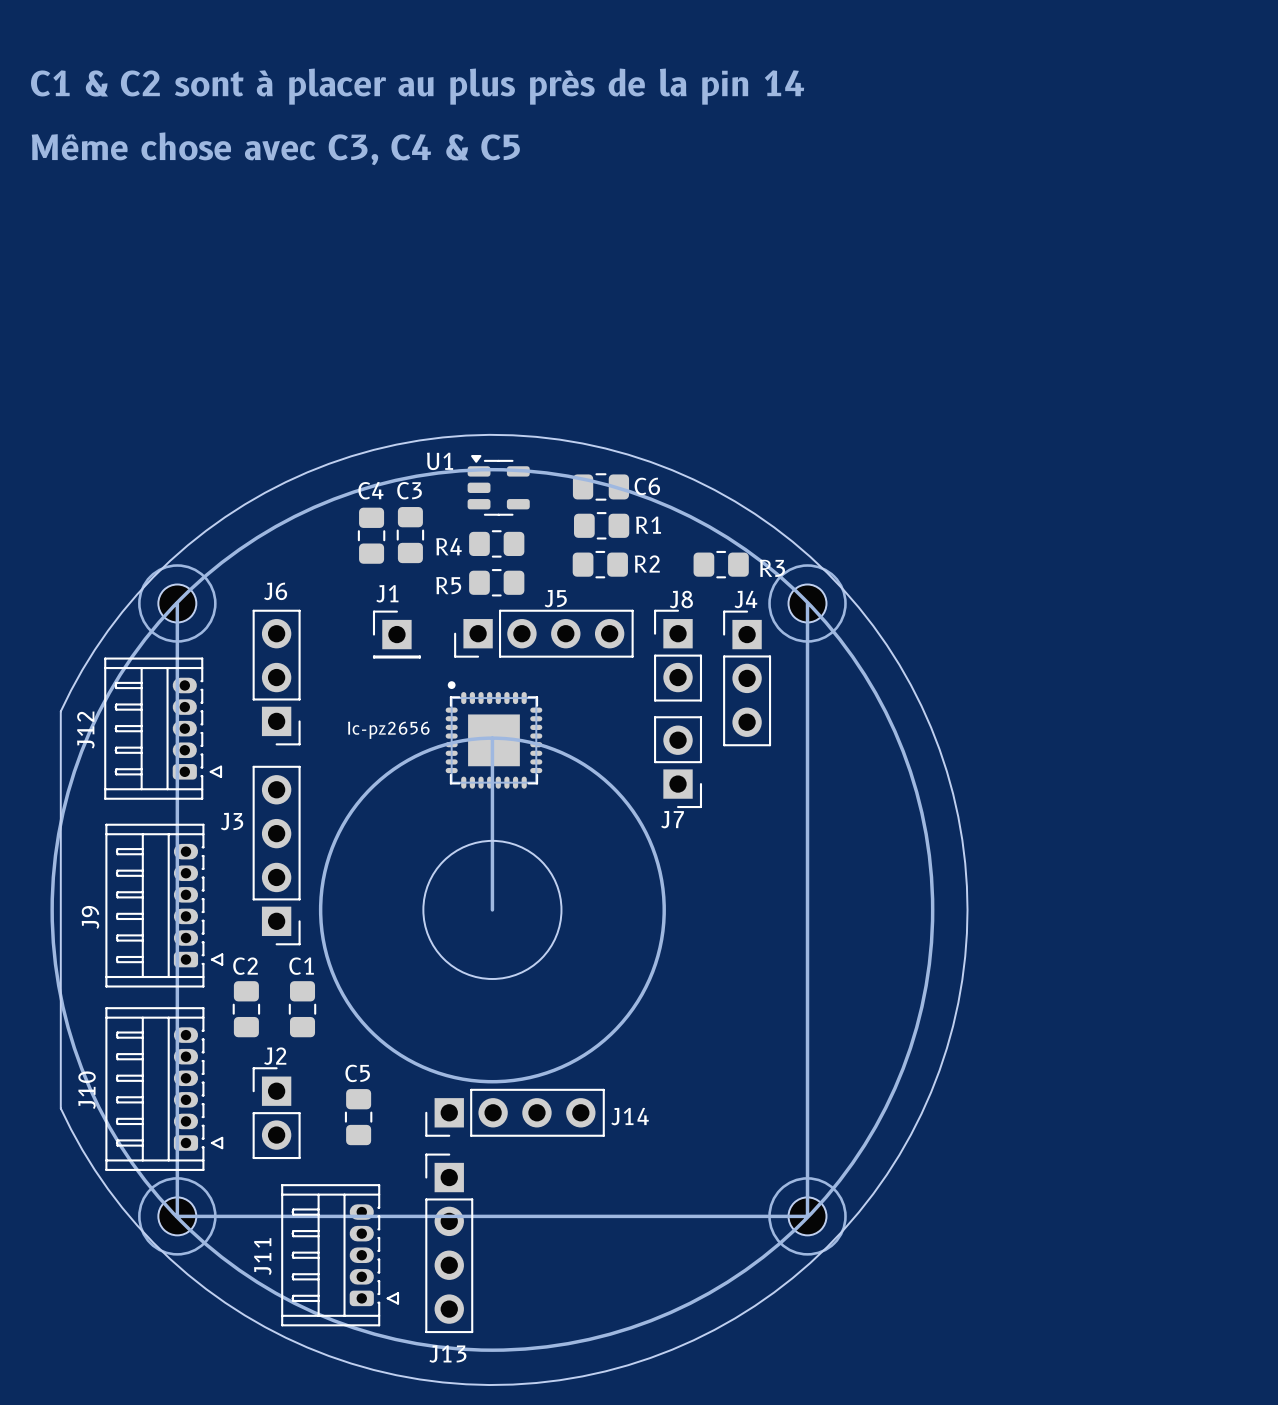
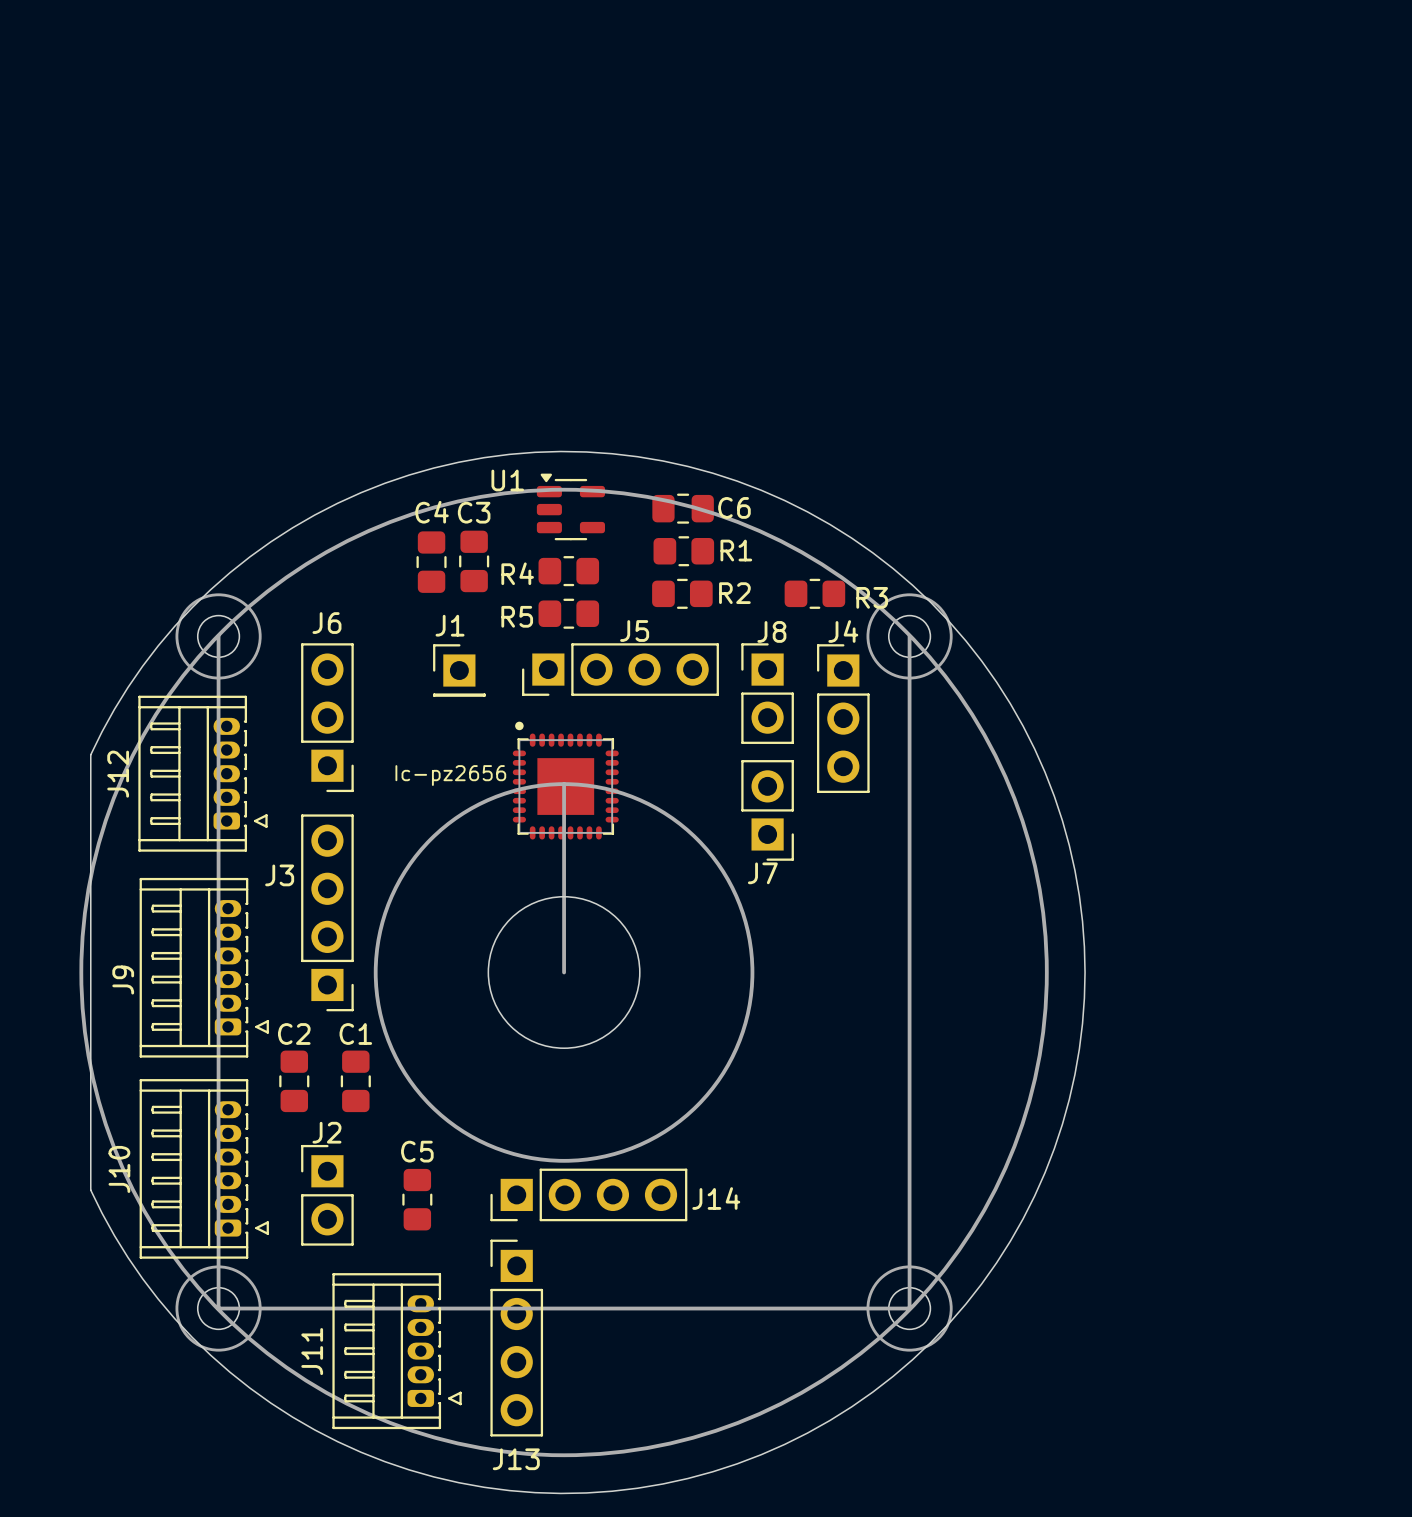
text: C1 & C2 sont à placer au plus près de la pin 14 (417, 86) -> none
text: Même chose avec C3, C4 & C5 (275, 148) -> none

